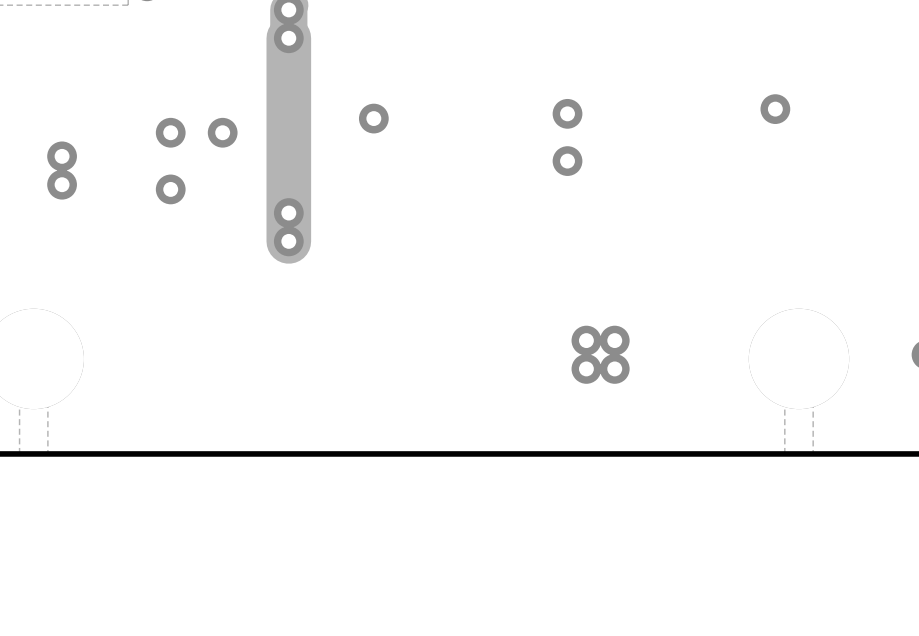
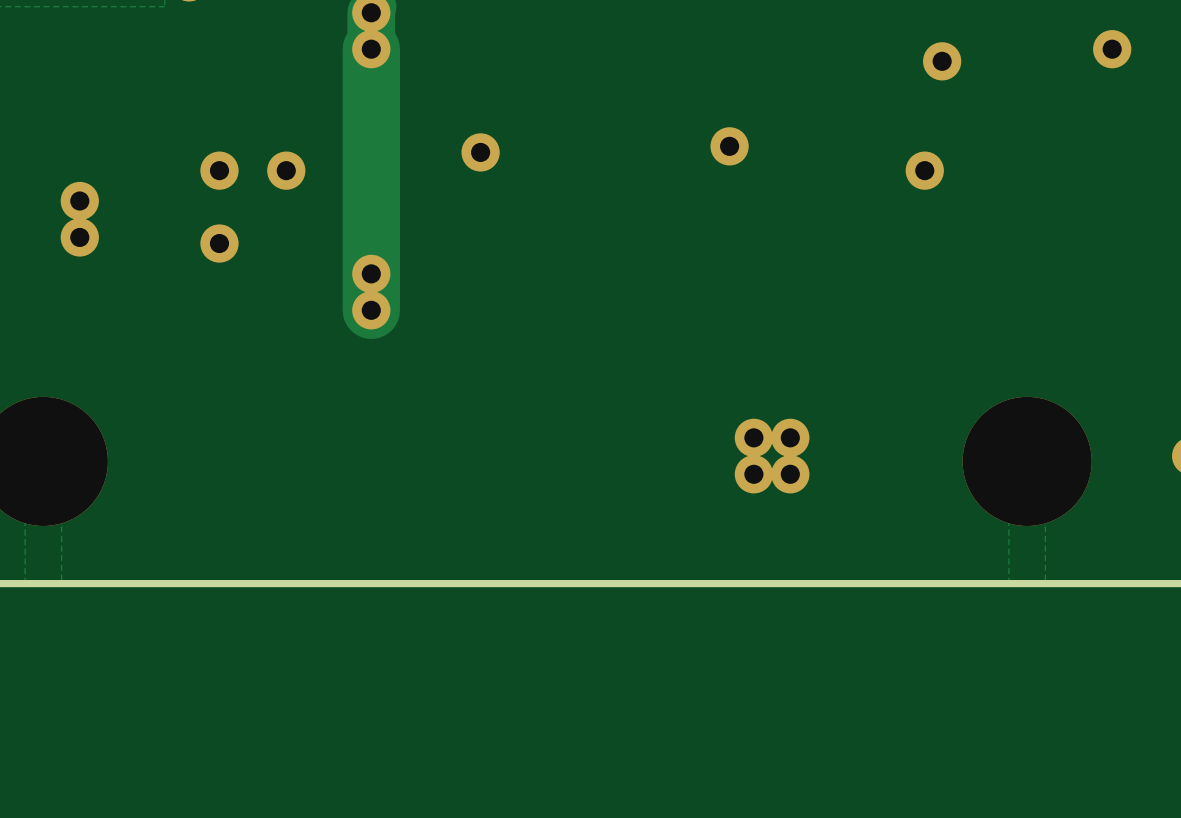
via: none -> (1112, 49)
via: none -> (942, 61)
via: (775, 109) -> none
via: none -> (924, 170)
via: (567, 161) -> none

